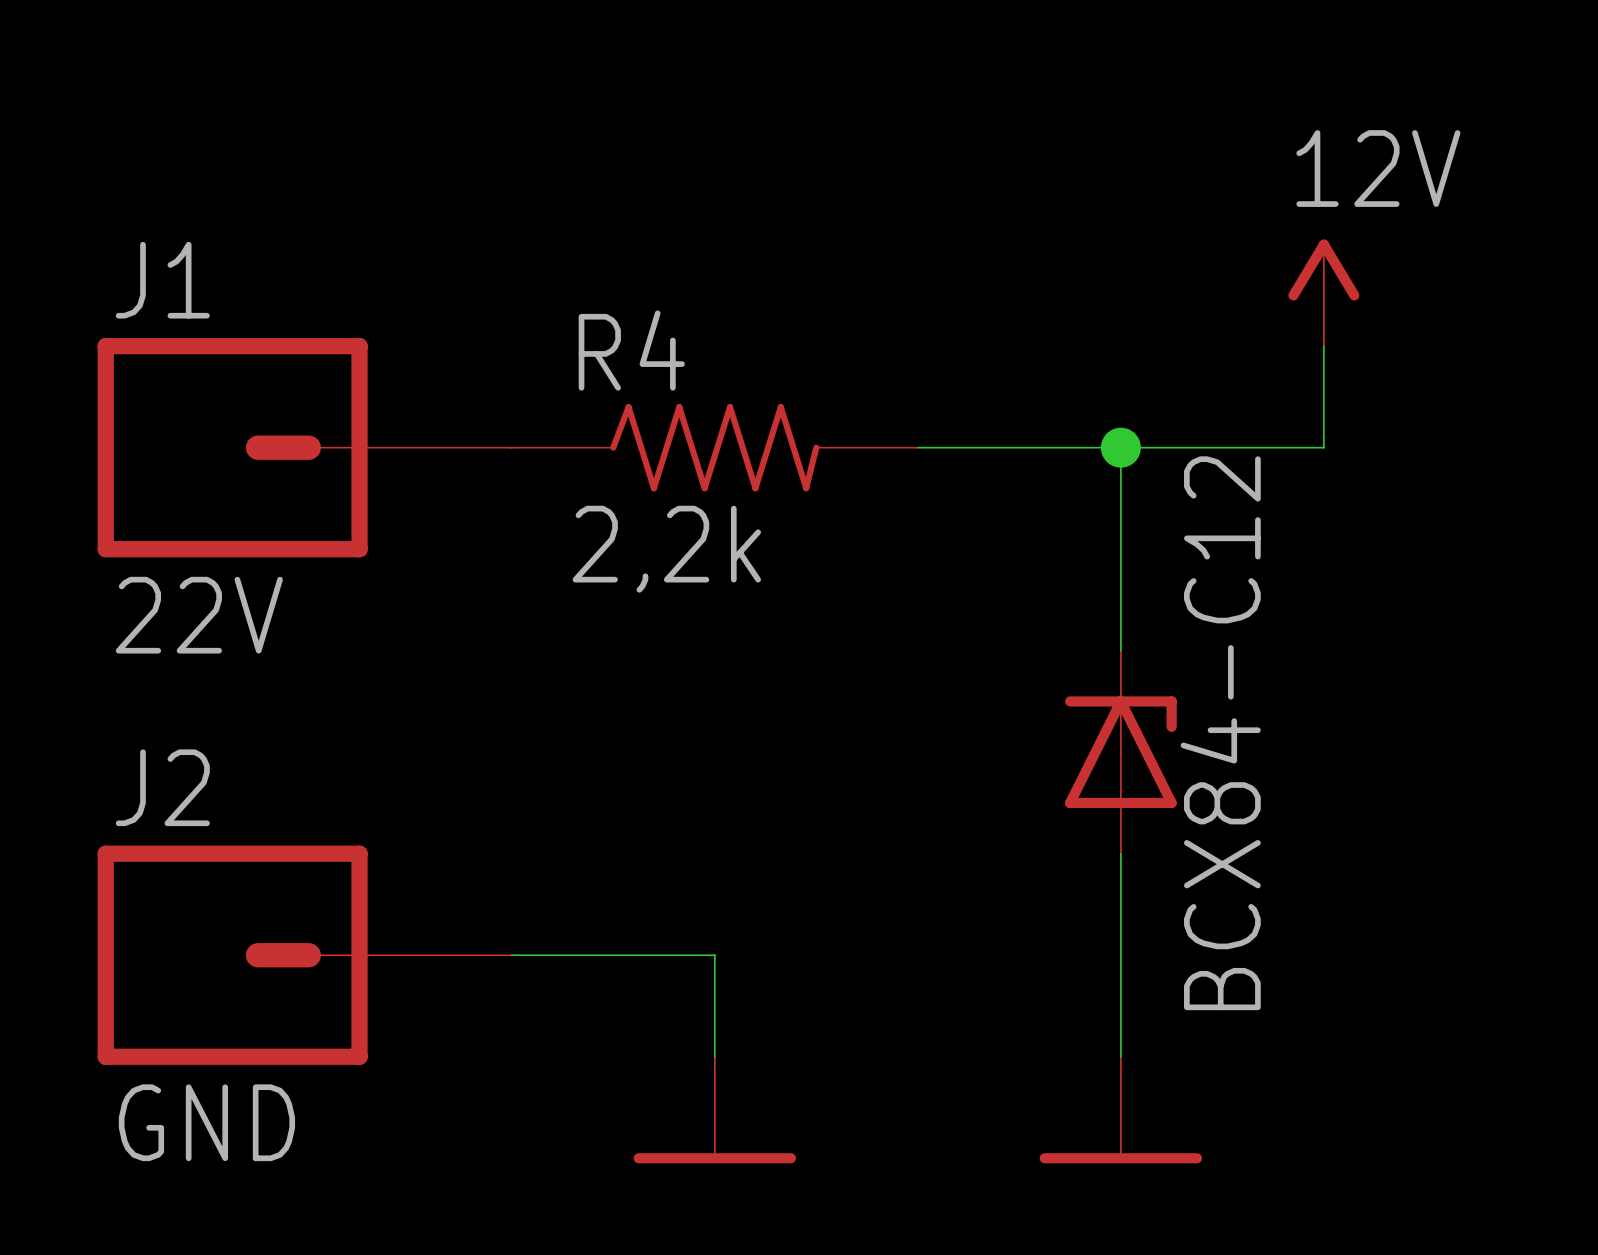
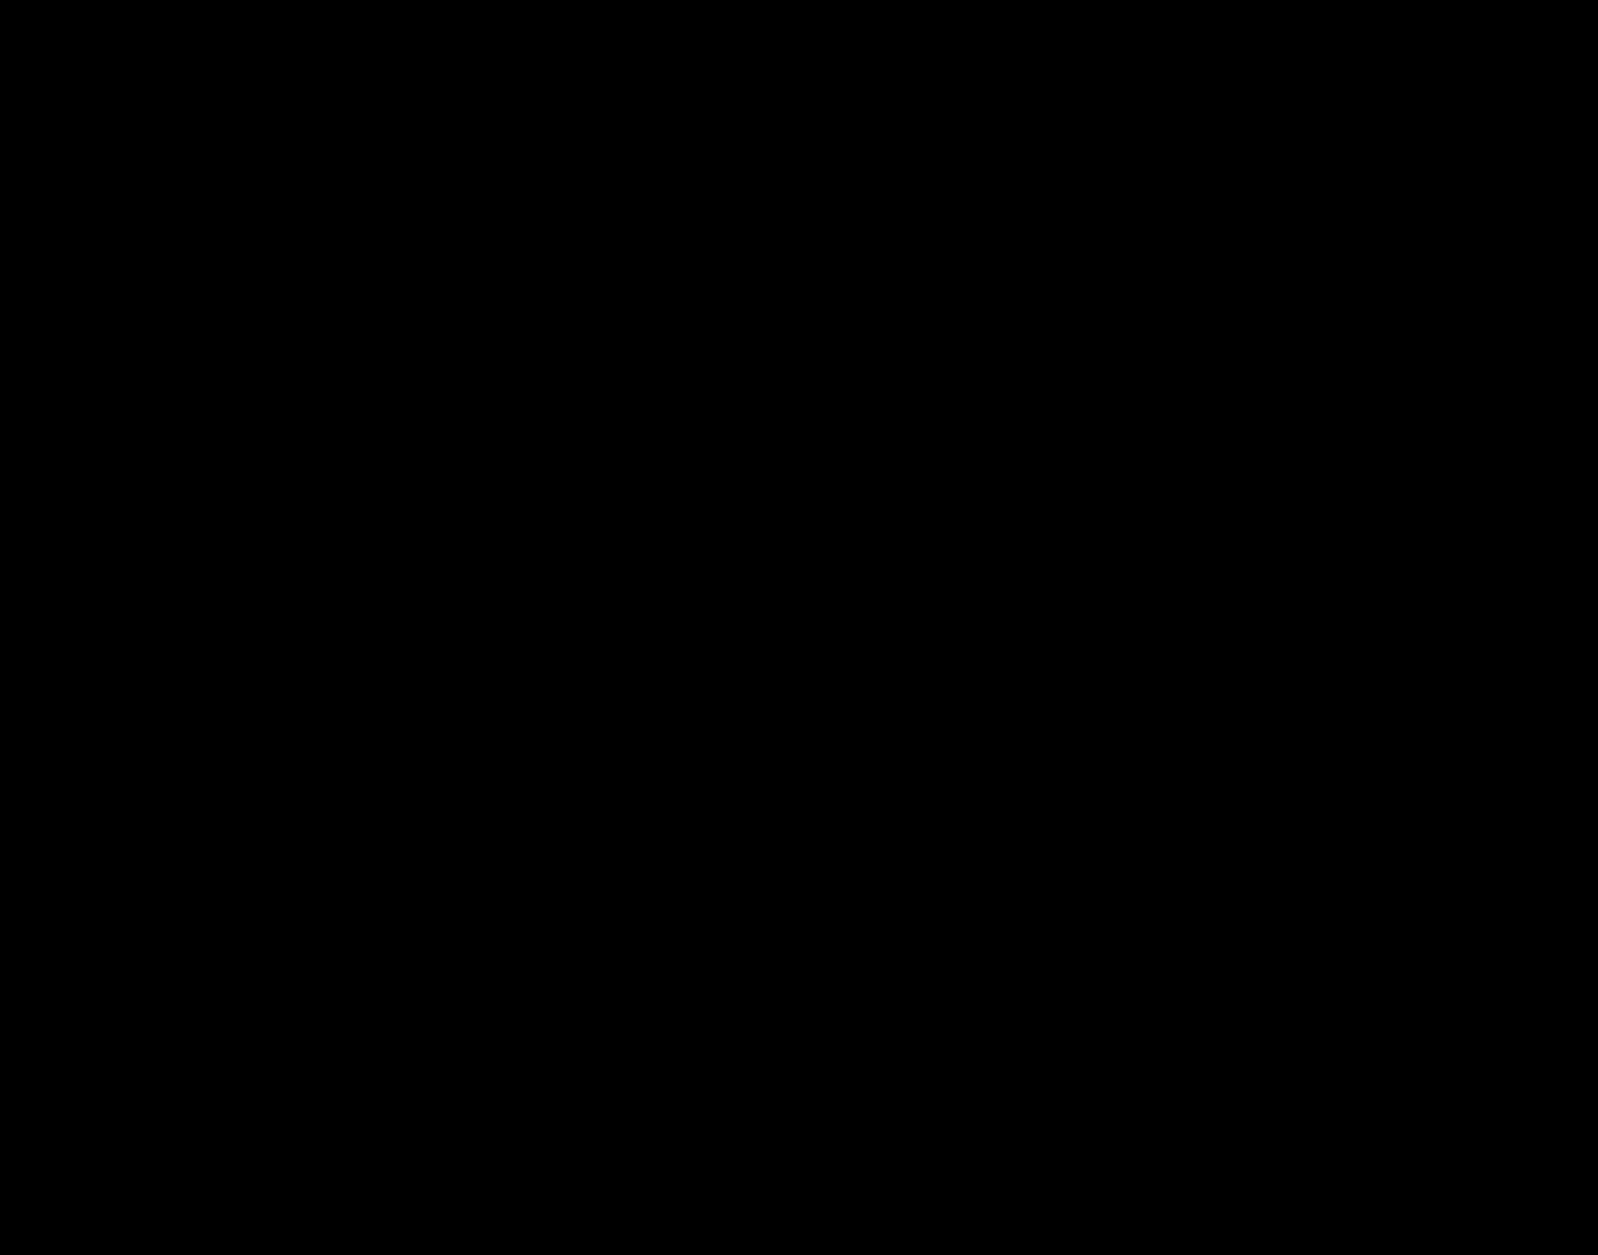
power symbol: 12V (1323, 292) -> none
wire: (1323, 346) (1323, 447) (917, 447) -> none
J1: 22V (304, 447) -> none
R4: 2,2k (714, 447) -> none
wire: (1120, 447) (1120, 650) -> none
junction: (1120, 447) -> none
part: BCX84-C12 (1120, 752) -> none
wire: (1120, 853) (1120, 1056) -> none
J2: GND (304, 955) -> none
wire: (511, 955) (714, 955) (714, 1056) -> none
power symbol: (714, 1110) -> none
power symbol: (1120, 1110) -> none

